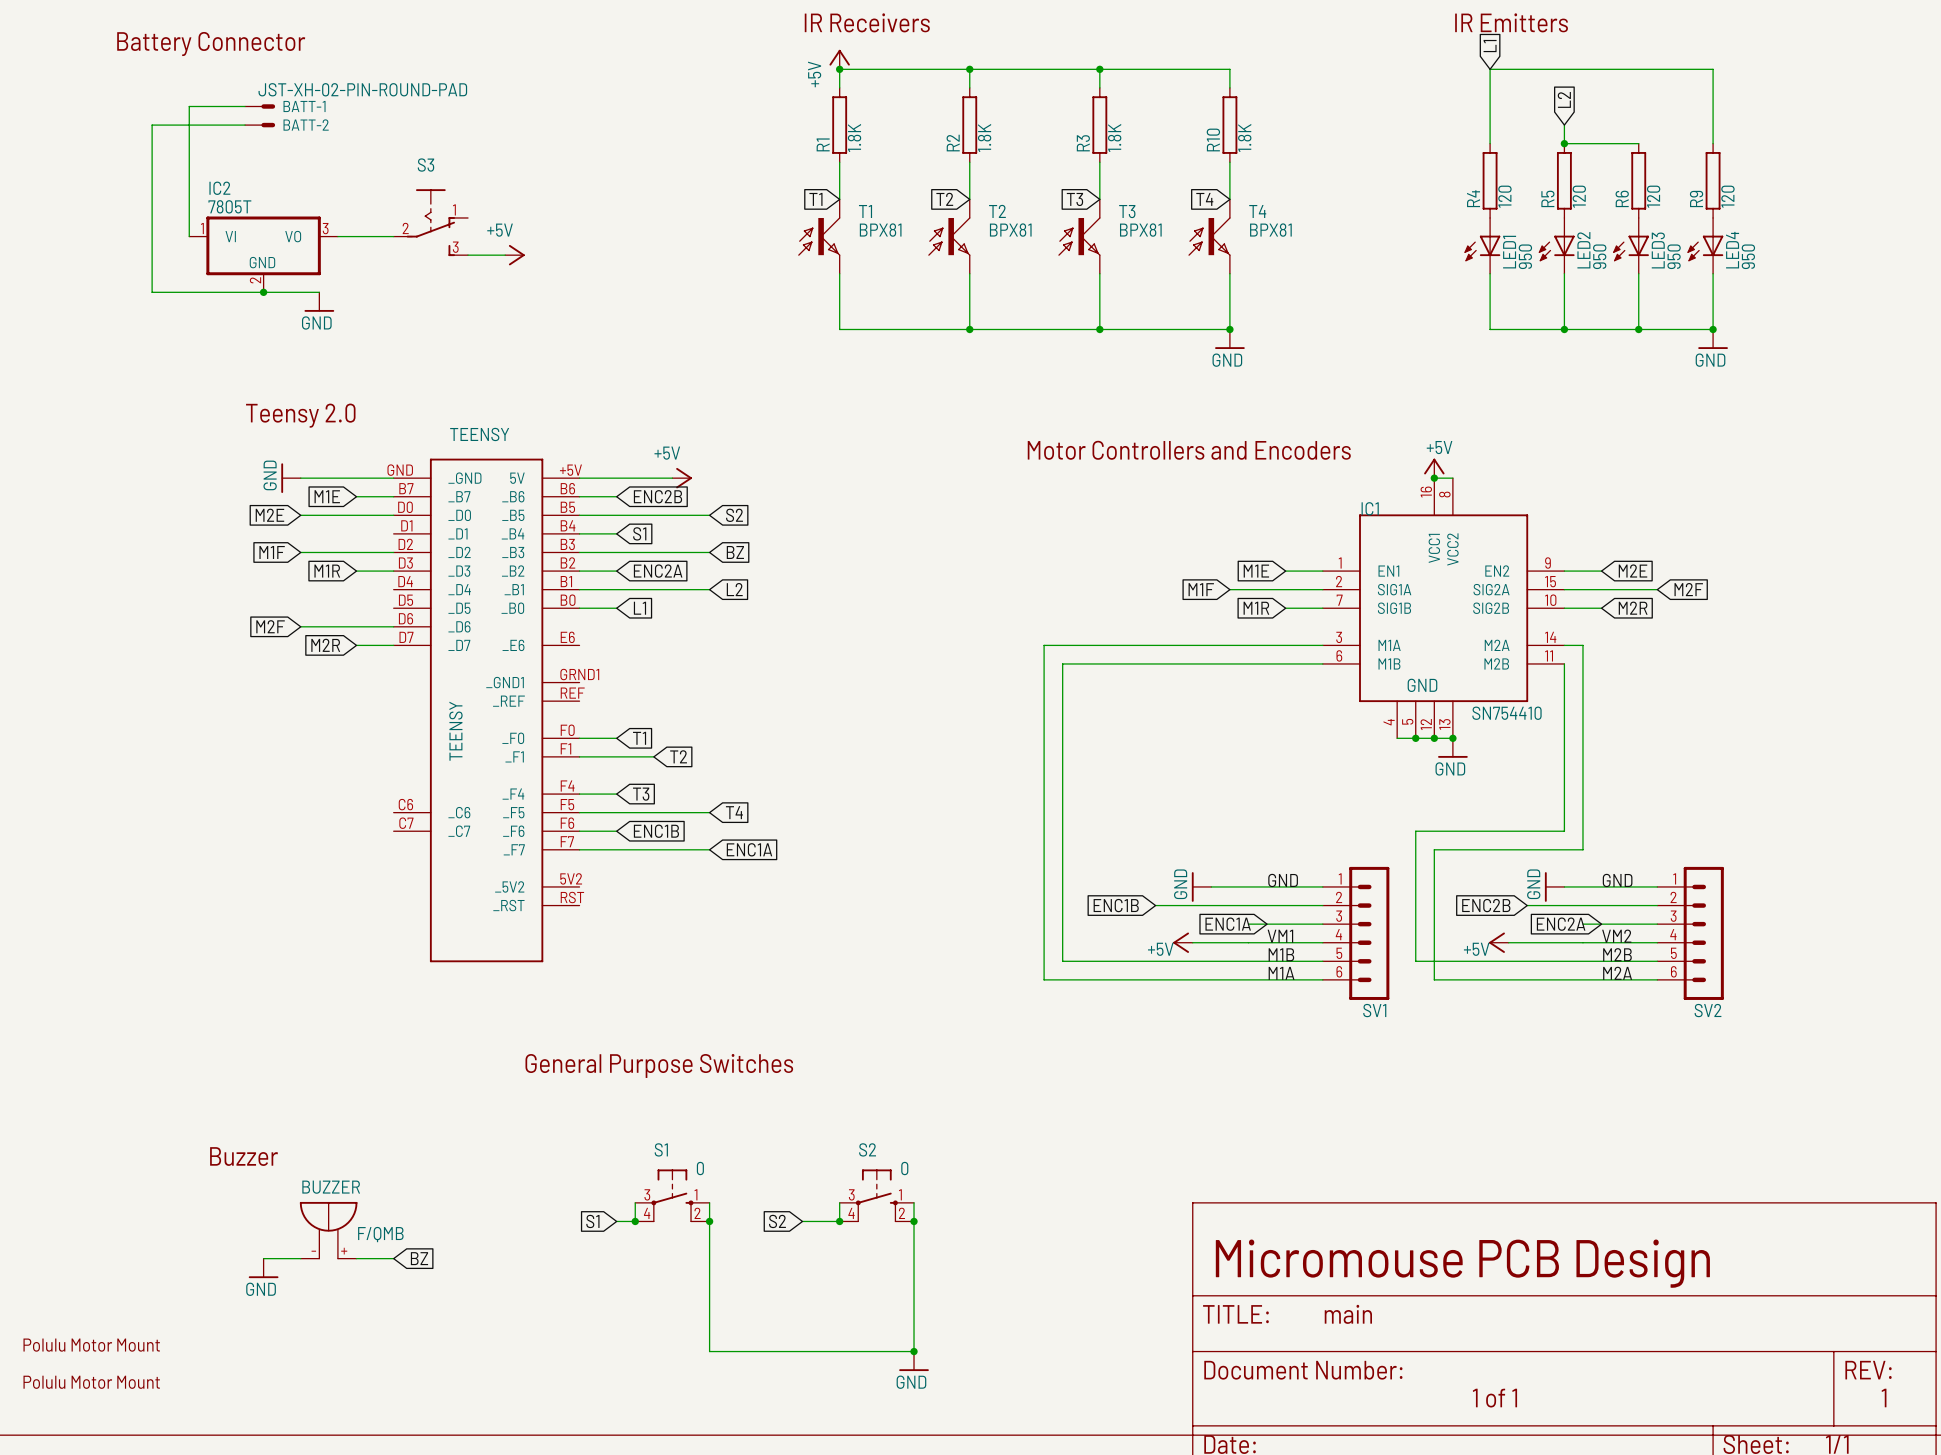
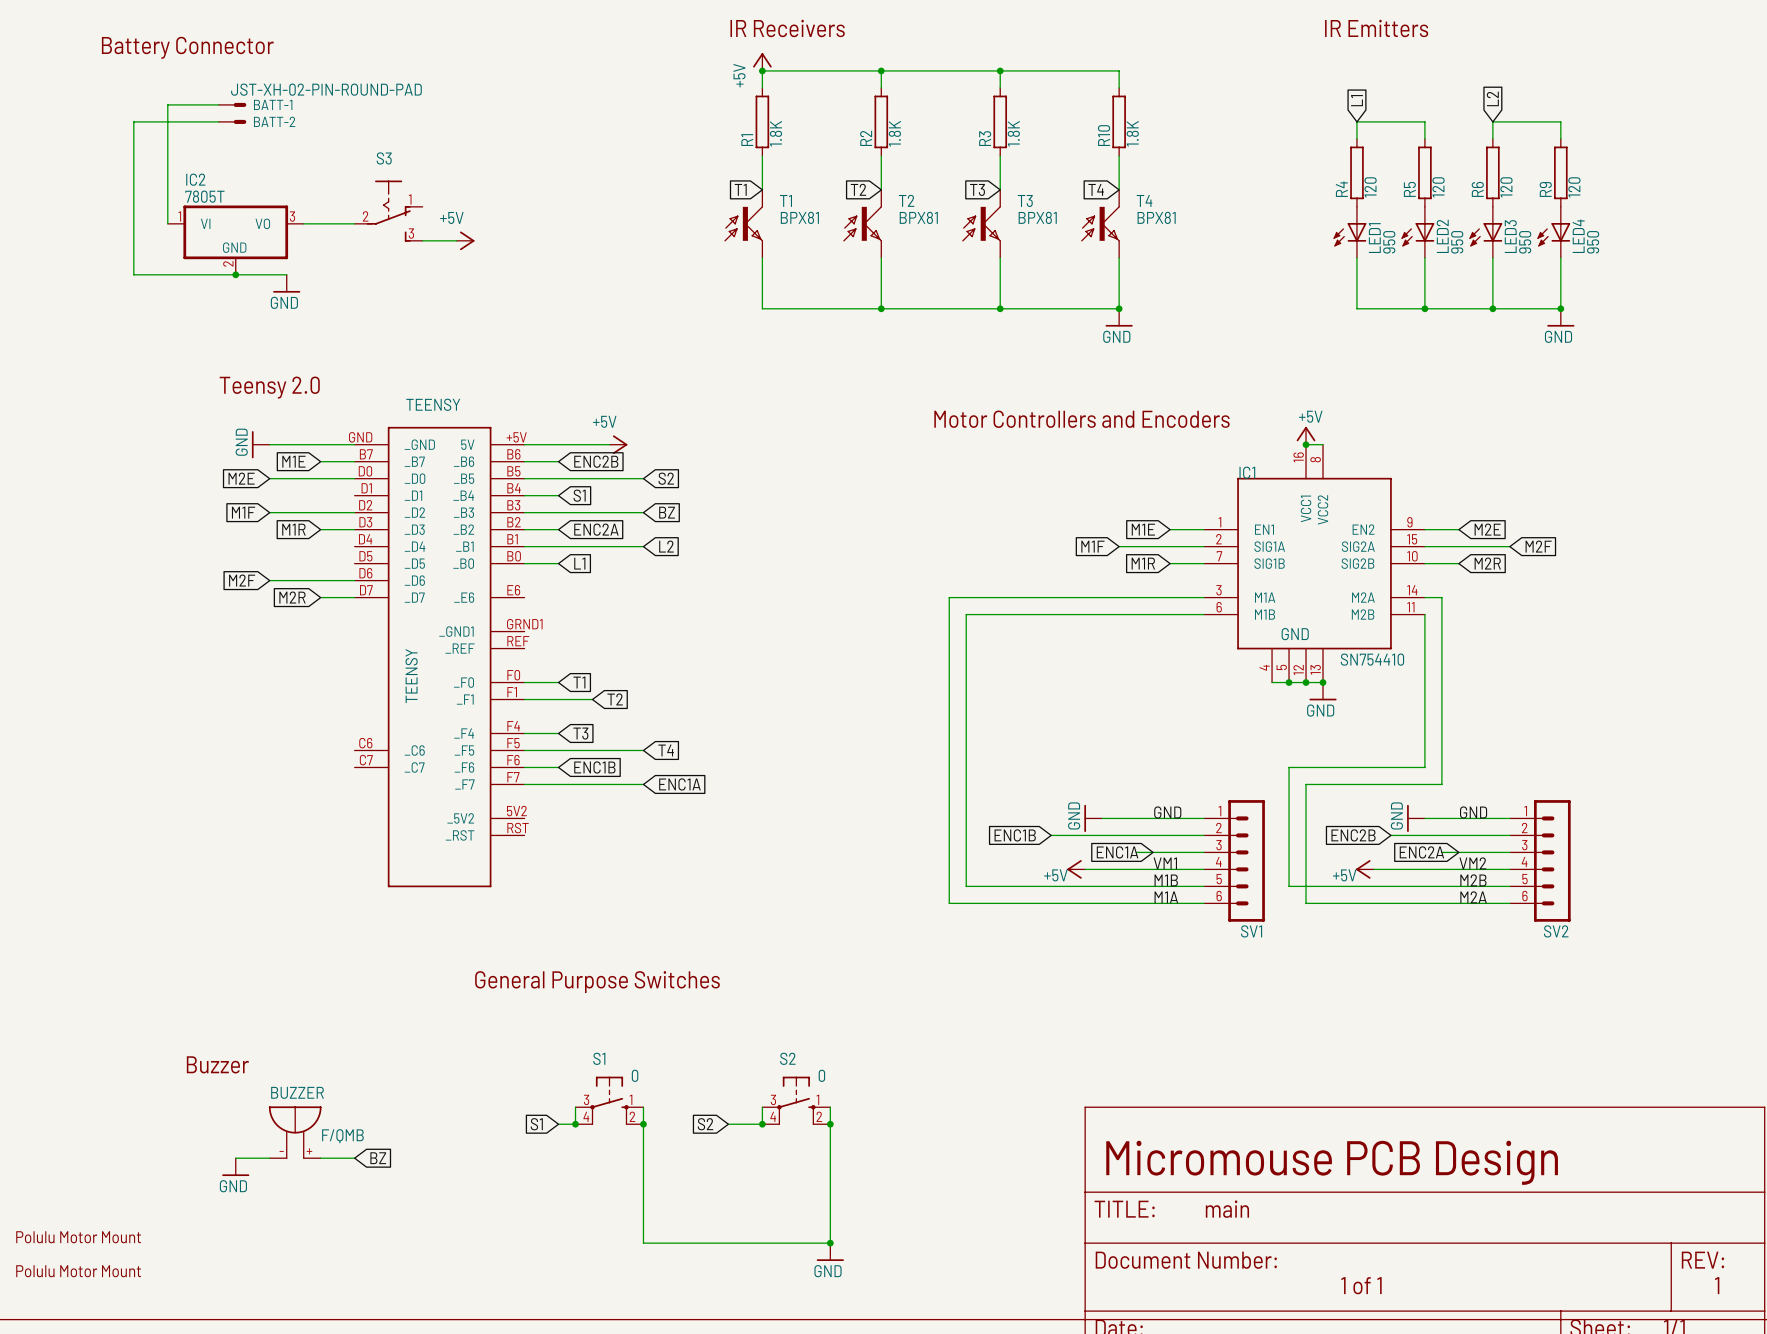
global label position: L1 (1490, 46) -> L1 (1356, 100)
global label position: L2 (1564, 99) -> L2 (1492, 98)
wire: (1490, 125) (1490, 69) (1713, 69) (1713, 125) -> (1356, 121) (1424, 121)
wire: (1564, 143) (1638, 143) -> (1560, 121) (1492, 121) (1492, 138)
junction: (1564, 143) -> none

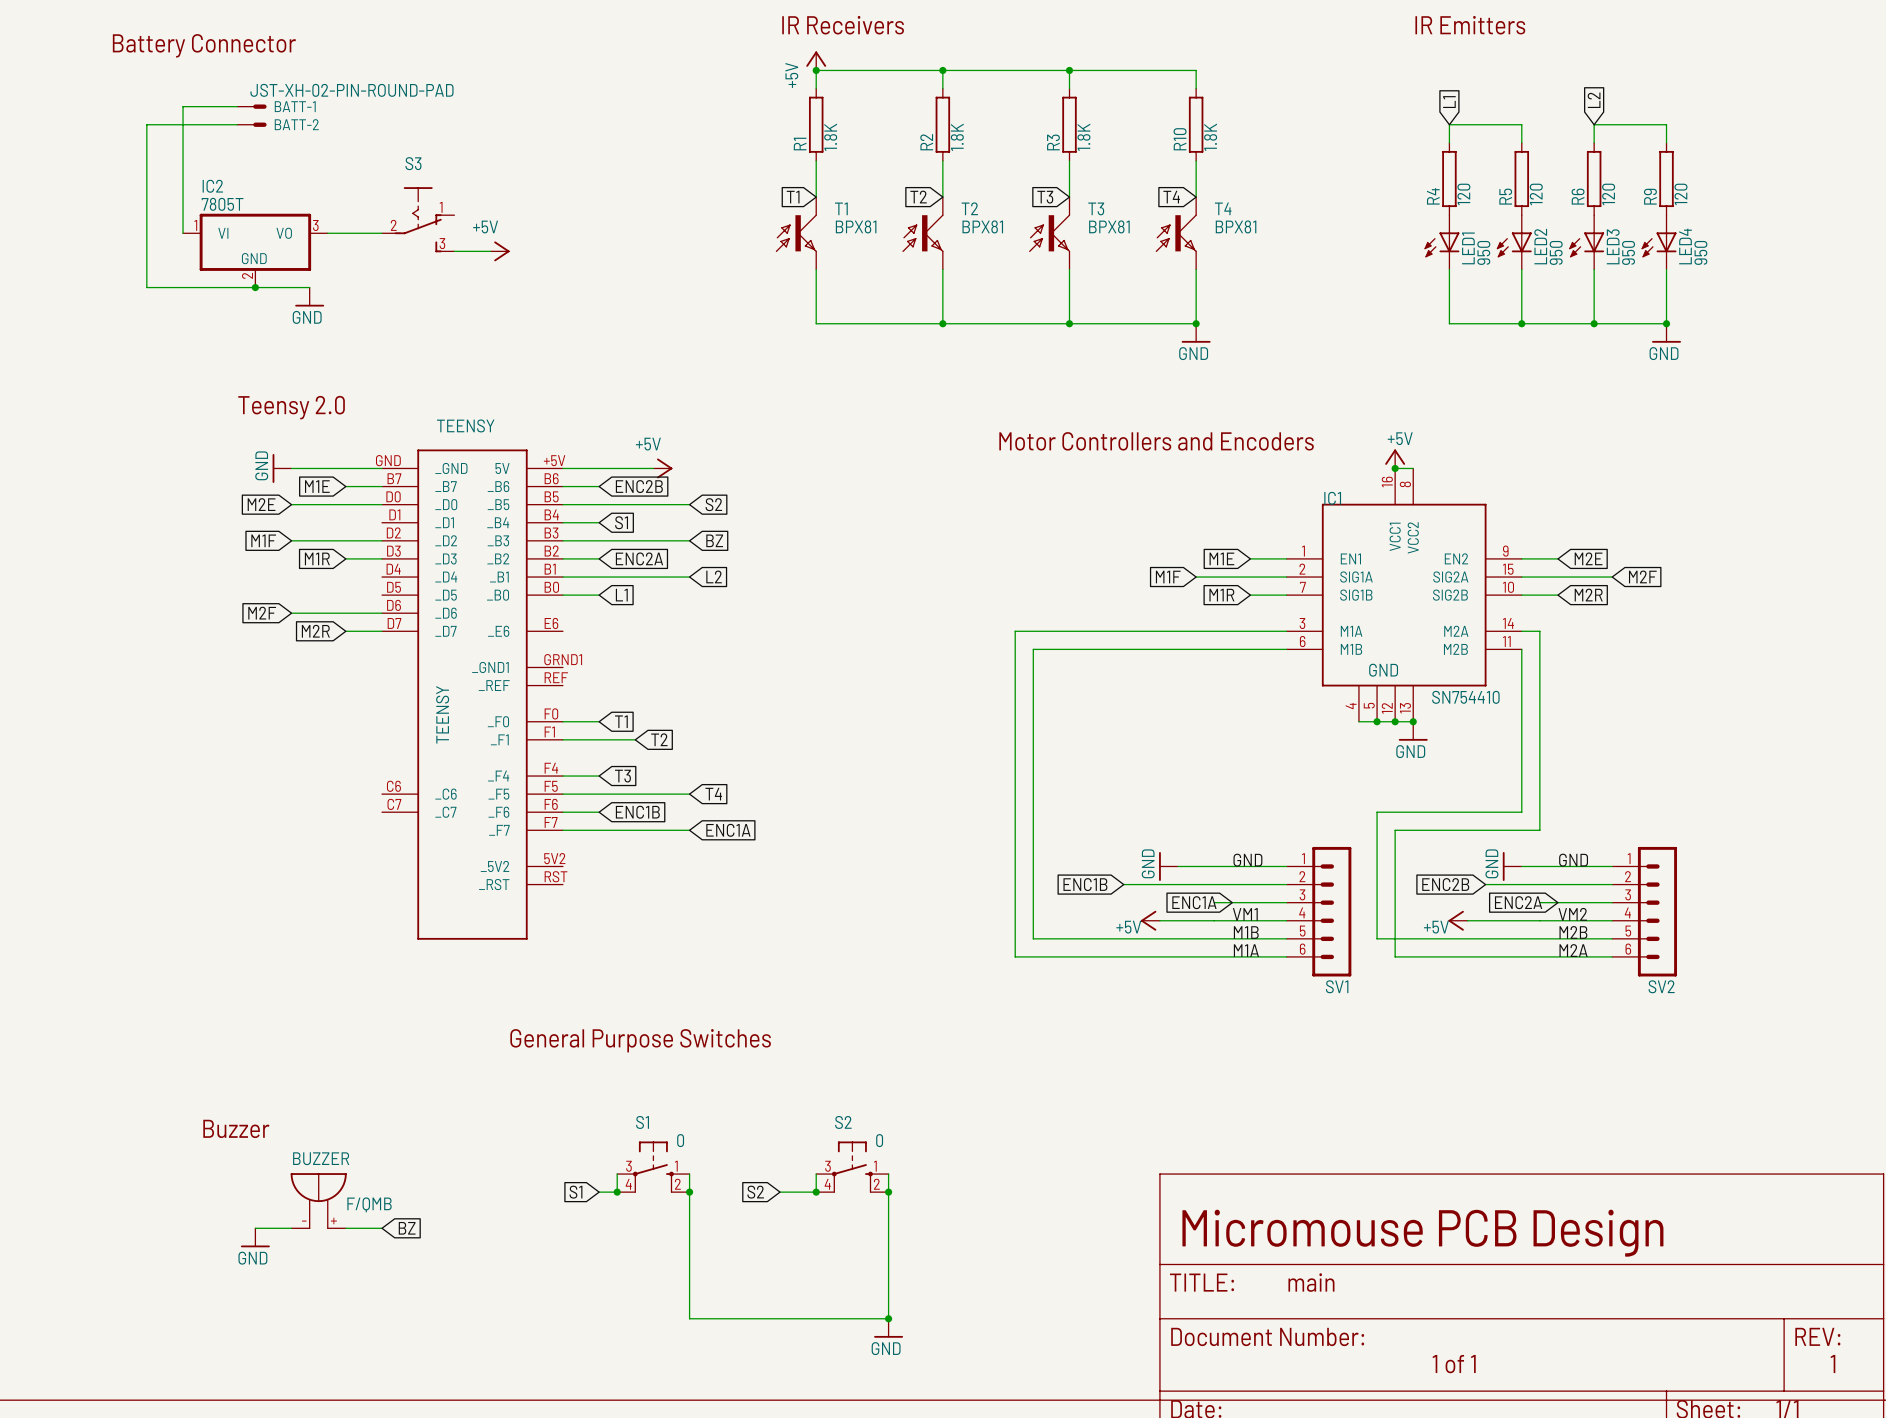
part: (78, 1237) -> none
part: (78, 1271) -> none

